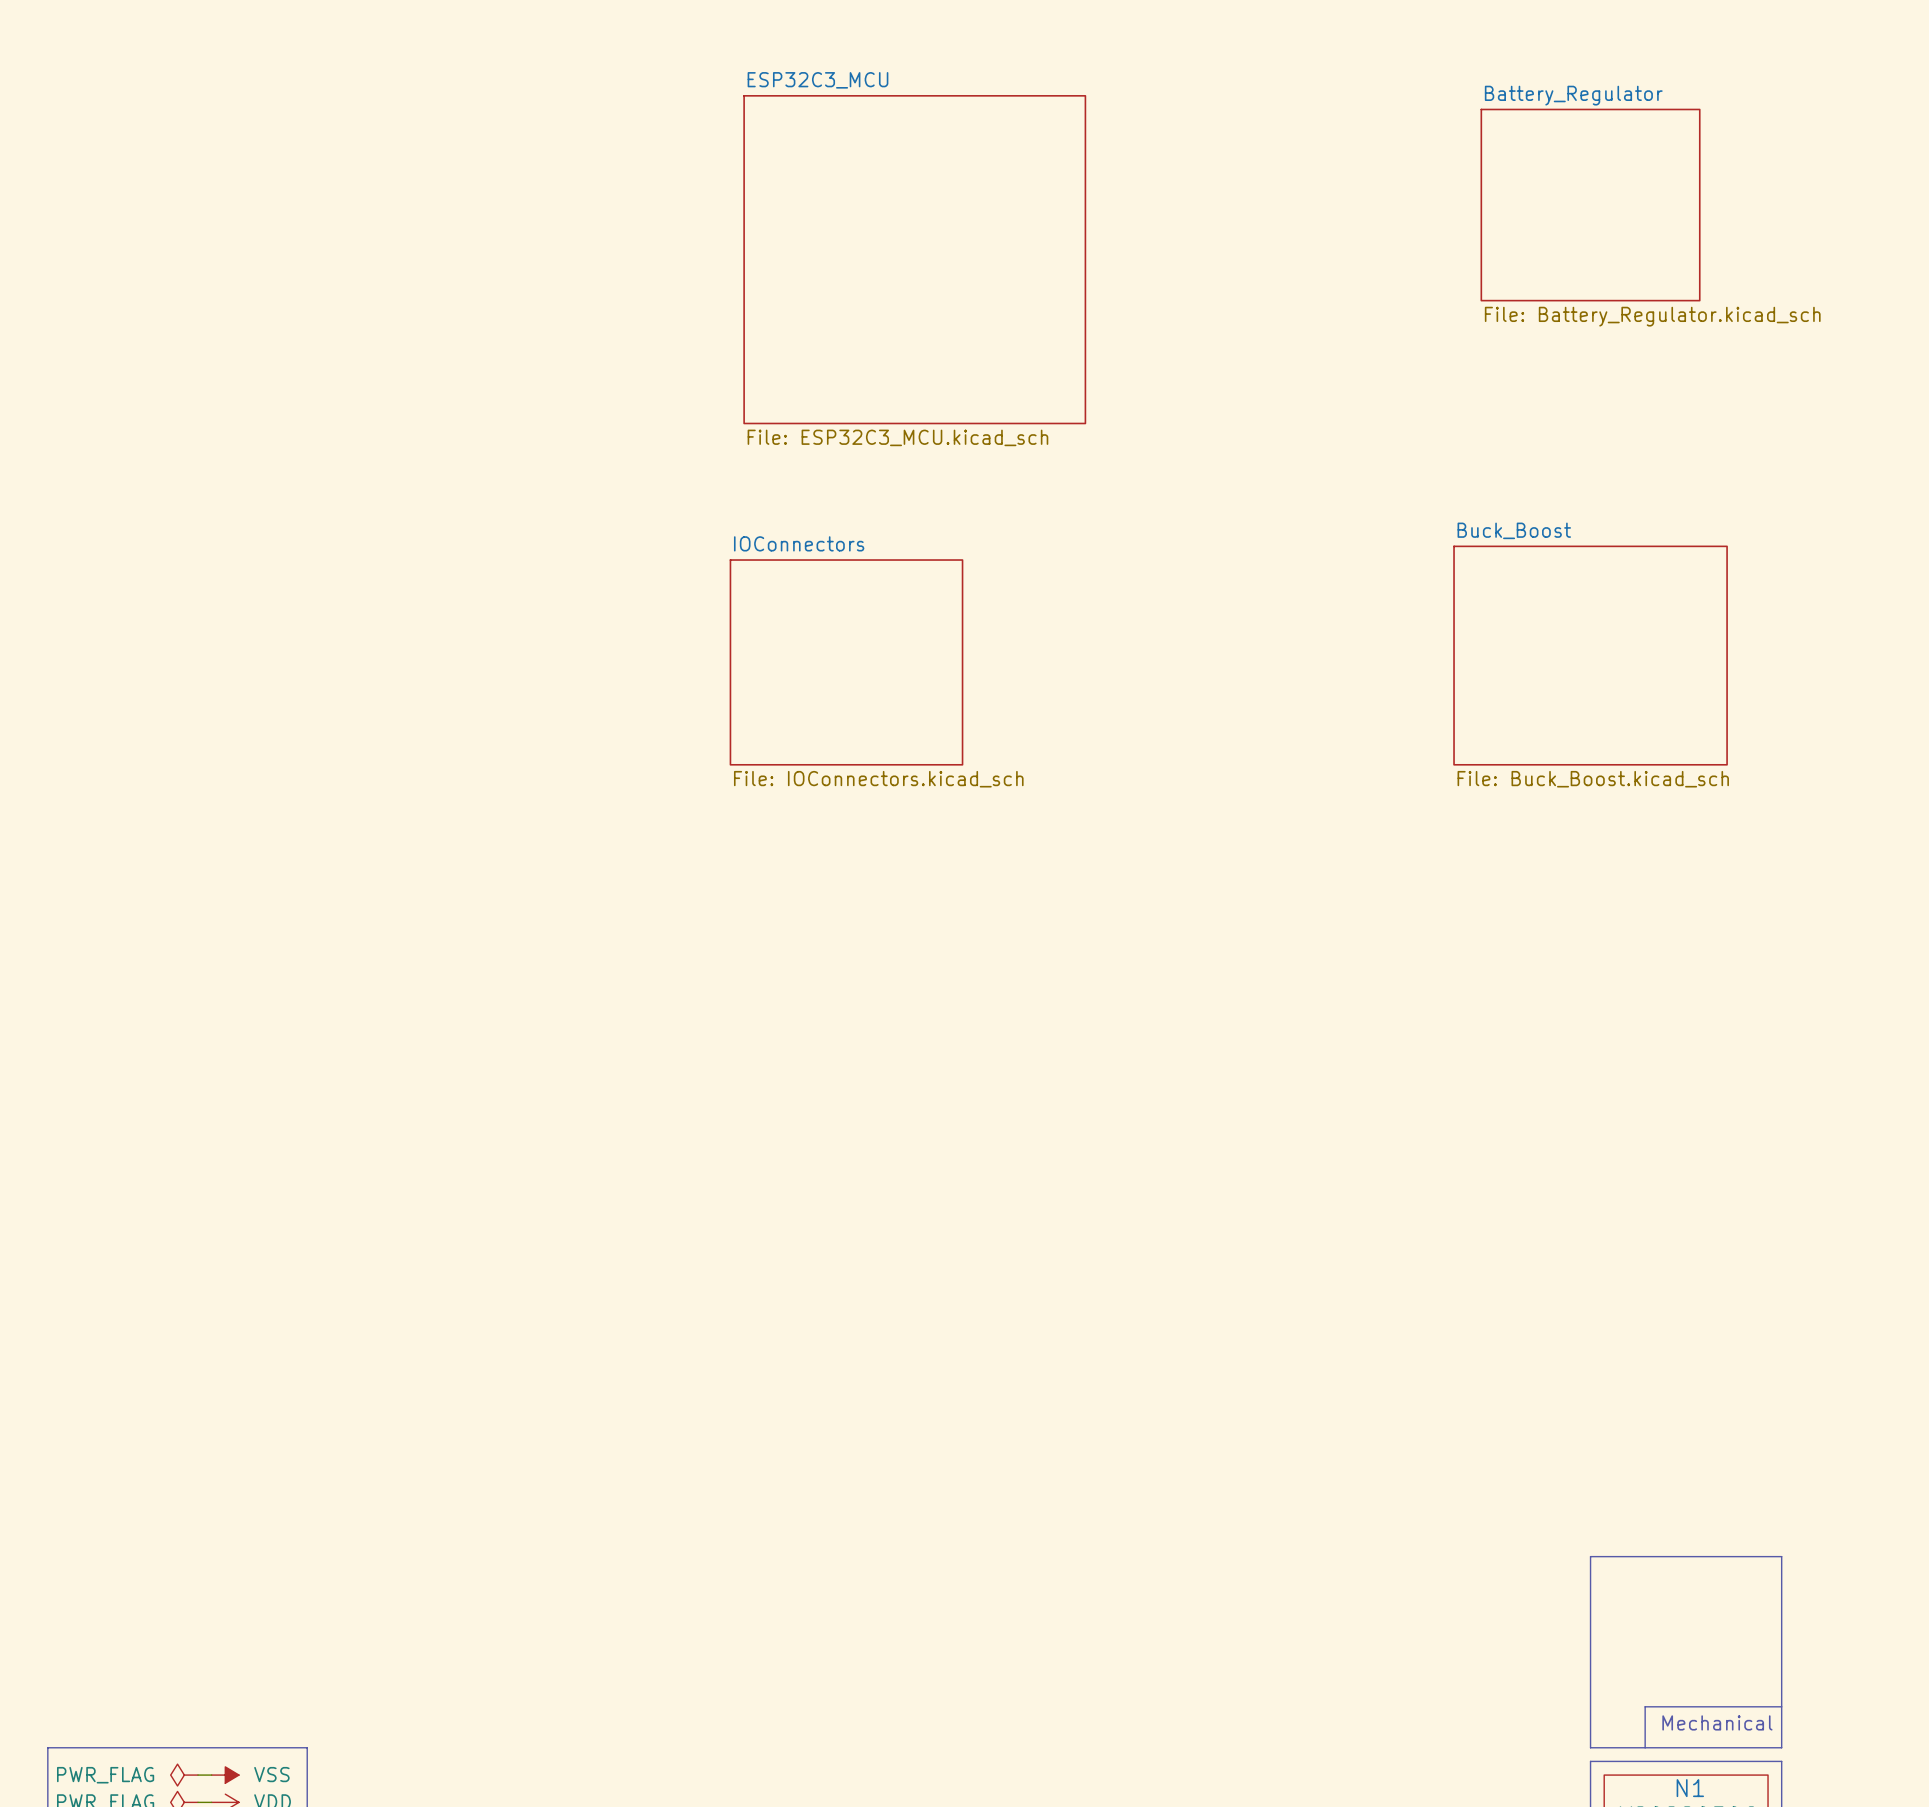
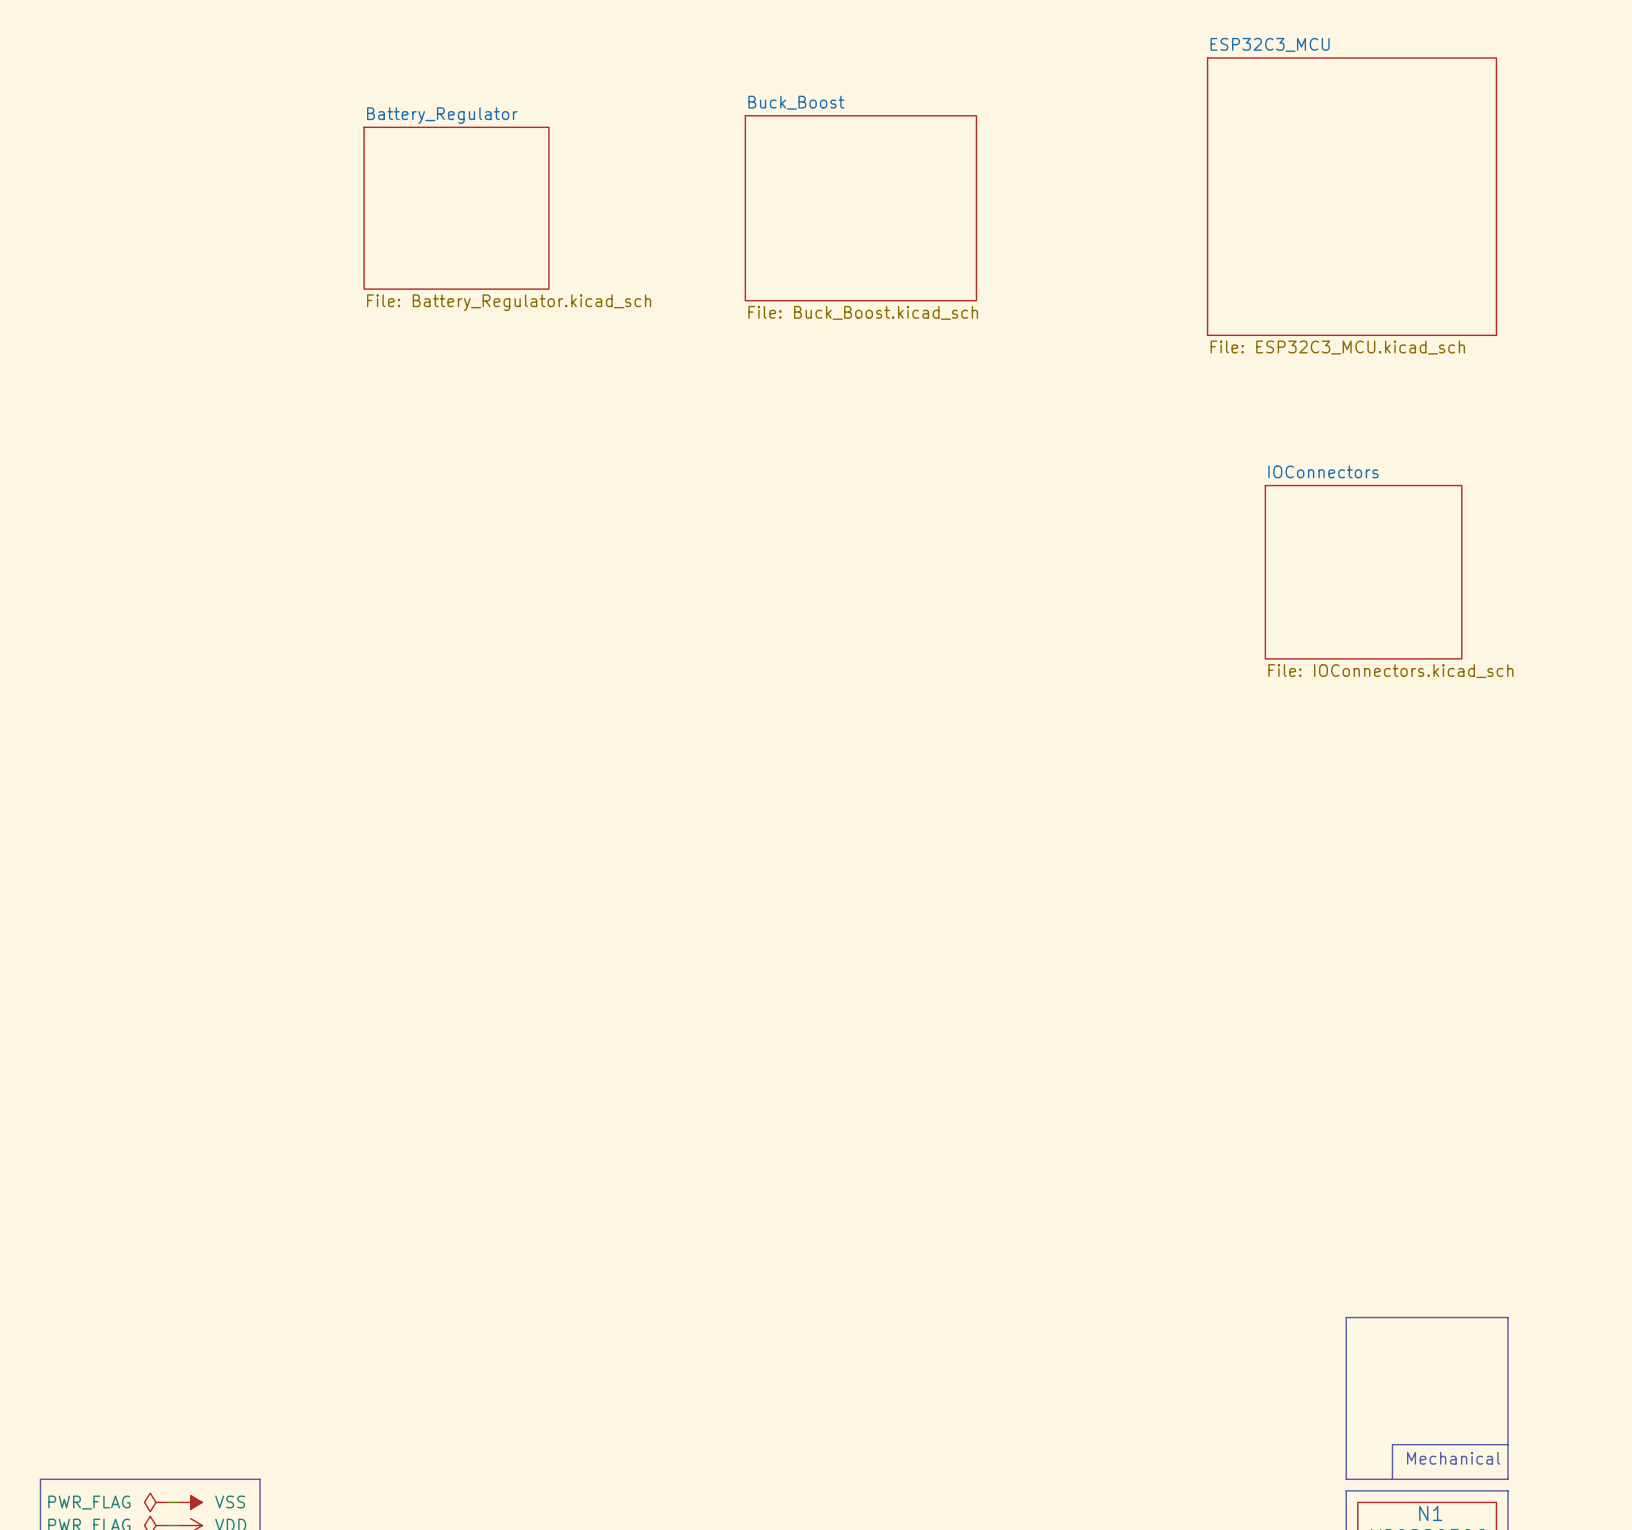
sheet Battery_Regulator: File: Battery_Regulator.kicad_sch (1590, 205) -> none
sheet Battery_Regulator: none -> File: Battery_Regulator.kicad_sch (456, 208)
sheet Buck_Boost: none -> File: Buck_Boost.kicad_sch (860, 208)
sheet ESP32C3_MCU position: (914, 259) -> (1352, 196)
sheet Buck_Boost: File: Buck_Boost.kicad_sch (1590, 655) -> none
sheet IOConnectors: File: IOConnectors.kicad_sch (846, 662) -> none
sheet IOConnectors: none -> File: IOConnectors.kicad_sch (1363, 572)

